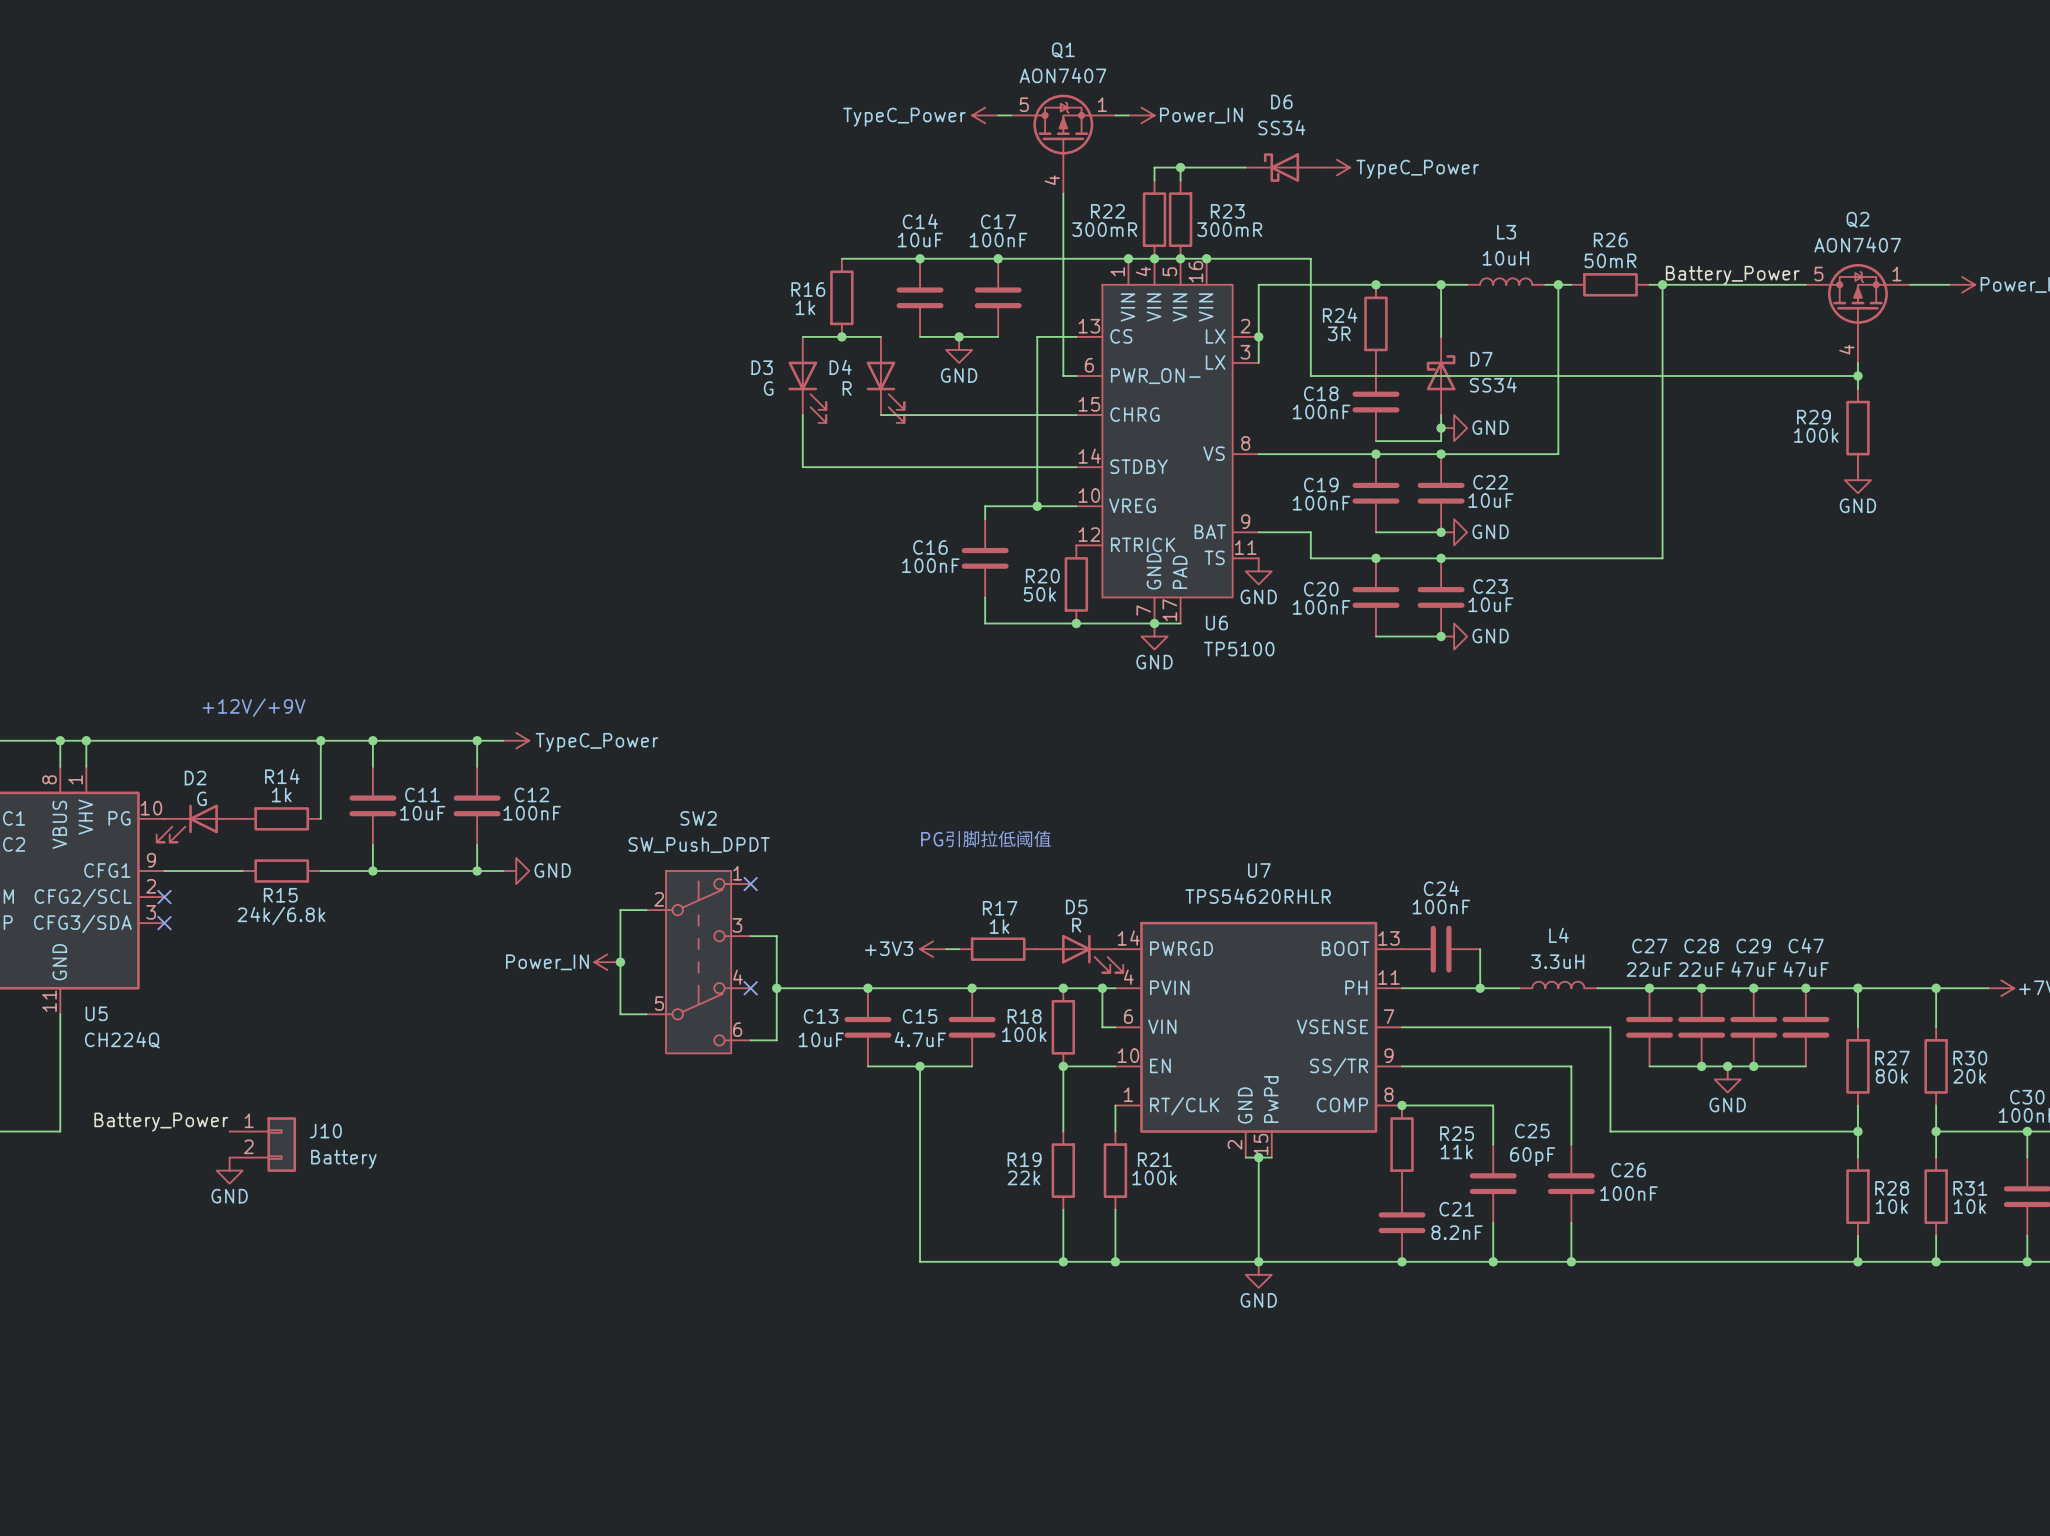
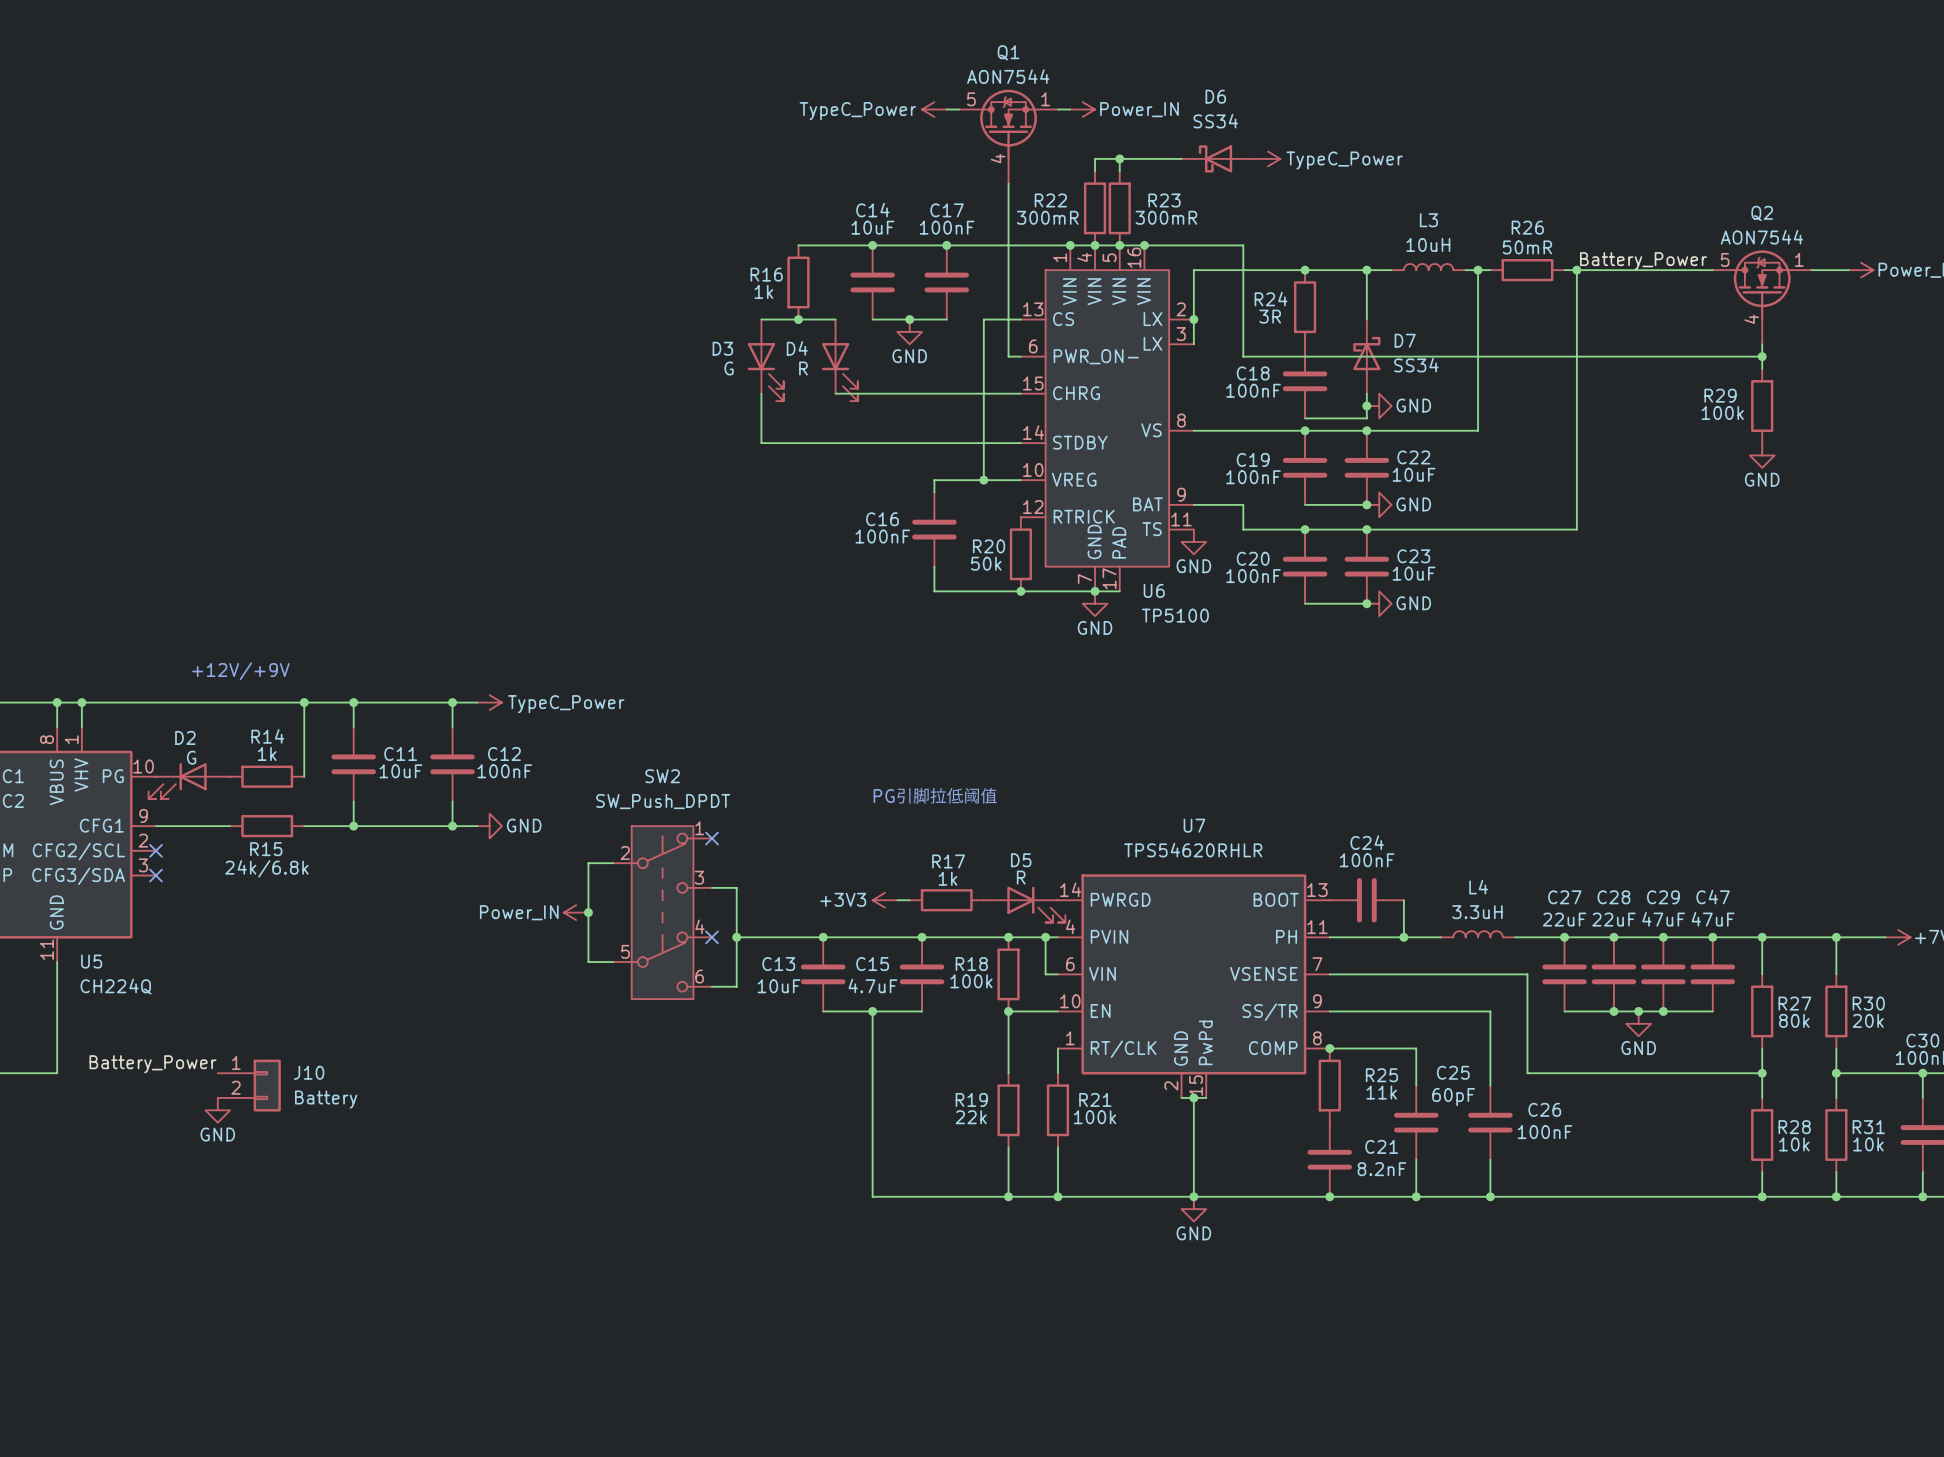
Q1 value: AON7407 (1063, 75) -> AON7544 (1008, 76)
Q1 symbol: [1011, 94, 1116, 194] -> [959, 89, 1058, 184]
Q2 value: AON7407 (1857, 244) -> AON7544 (1761, 237)
Q2 symbol: [1805, 263, 1911, 363] -> [1712, 250, 1812, 345]

